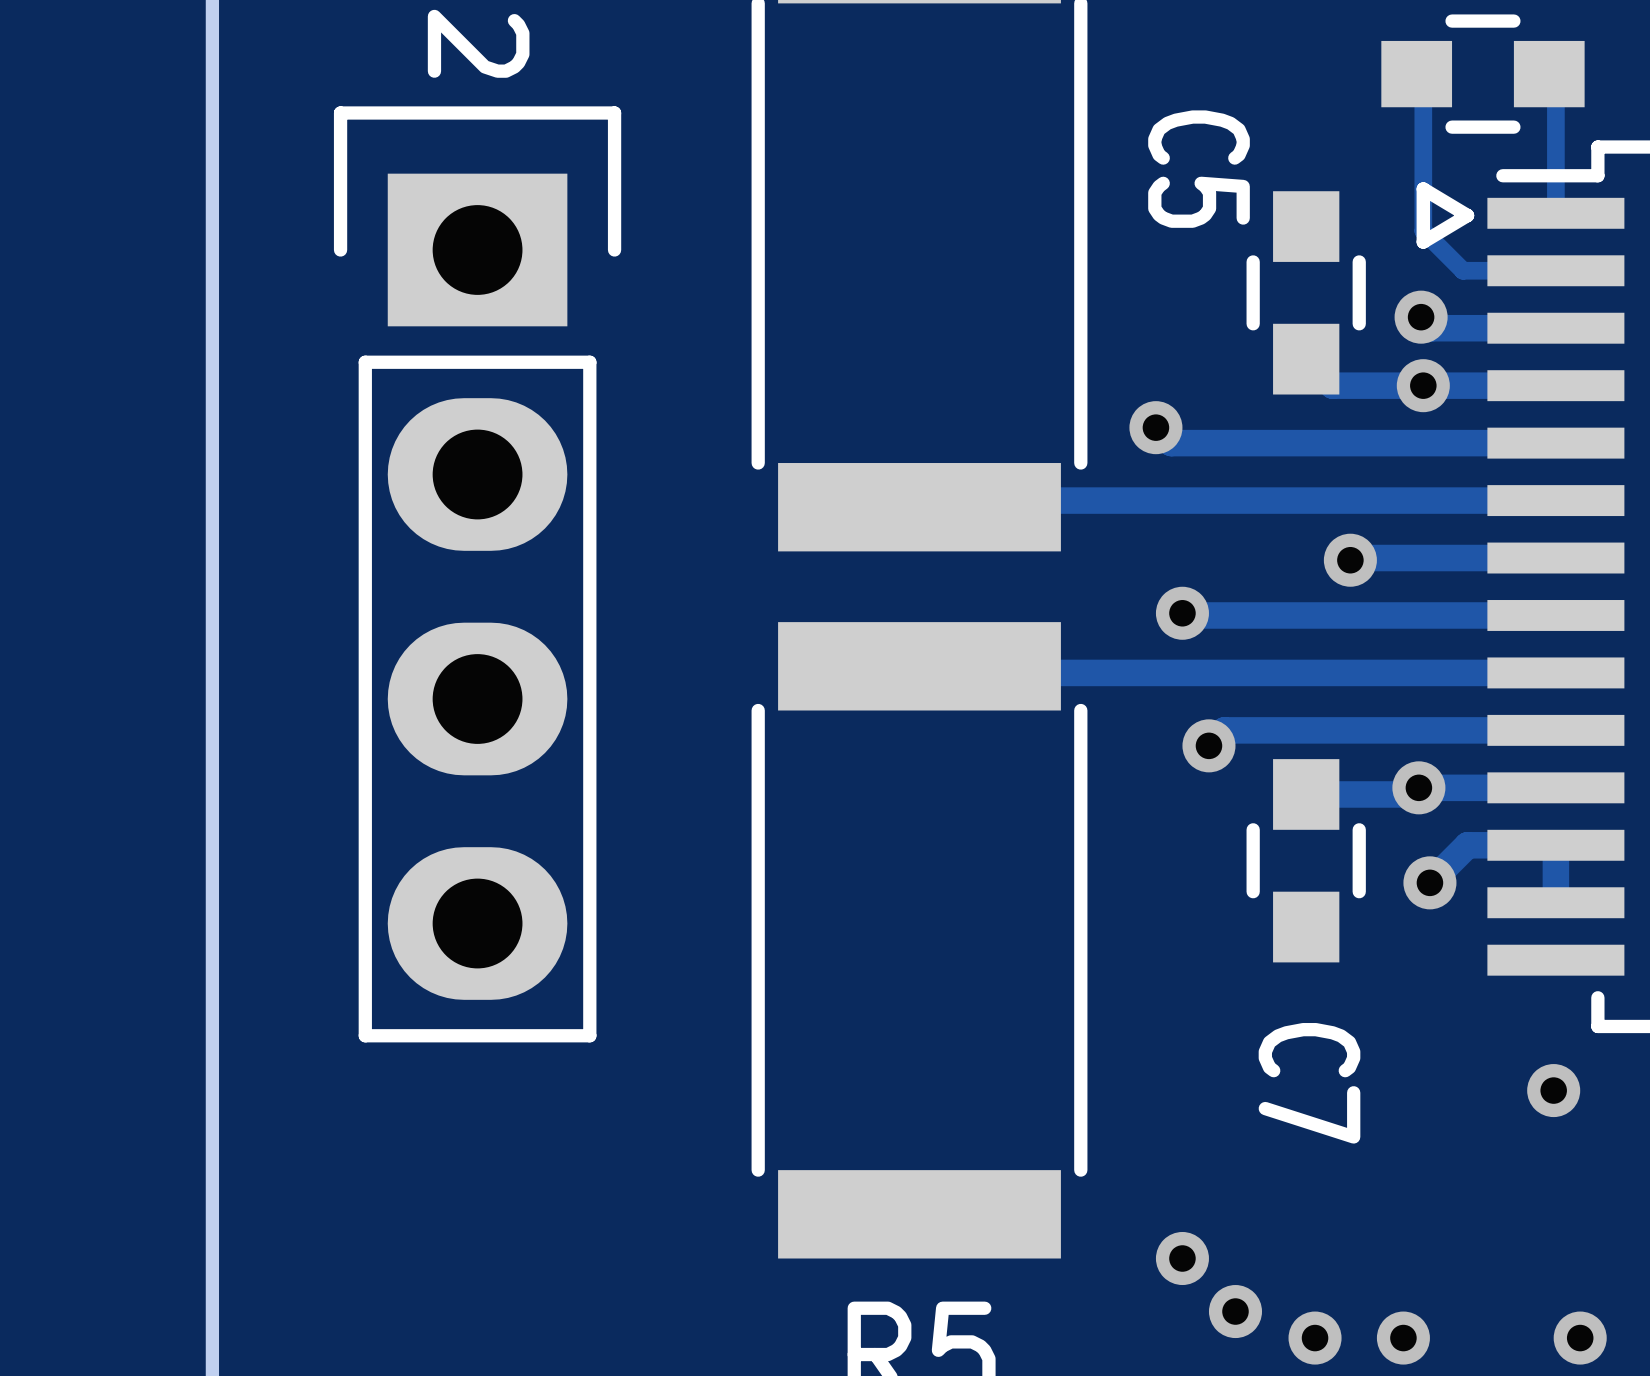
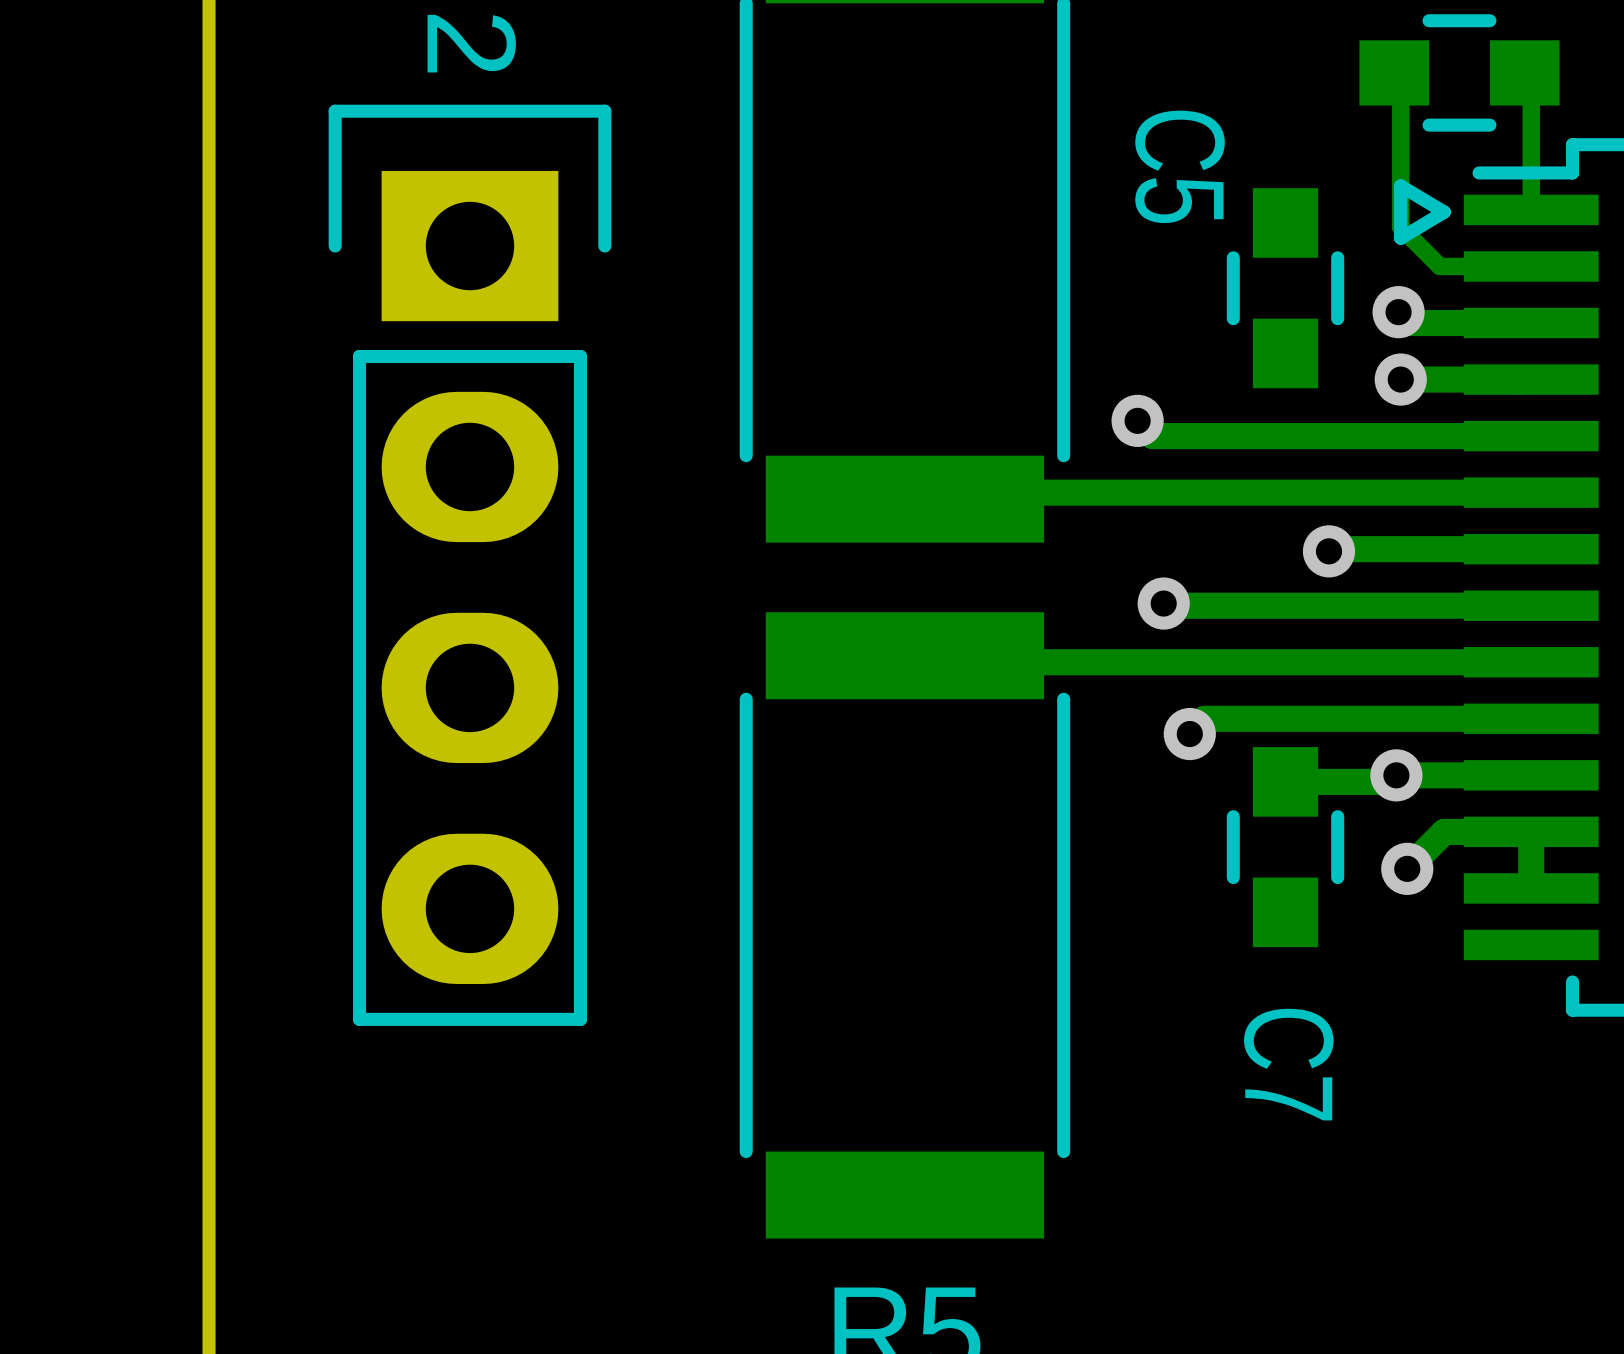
track: (1306, 359) (1332, 385) (1423, 385) -> none
via: (1553, 1090) -> none
via: (1182, 1258) -> none
via: (1235, 1311) -> none
via: (1315, 1338) -> none
via: (1403, 1338) -> none
via: (1580, 1338) -> none

